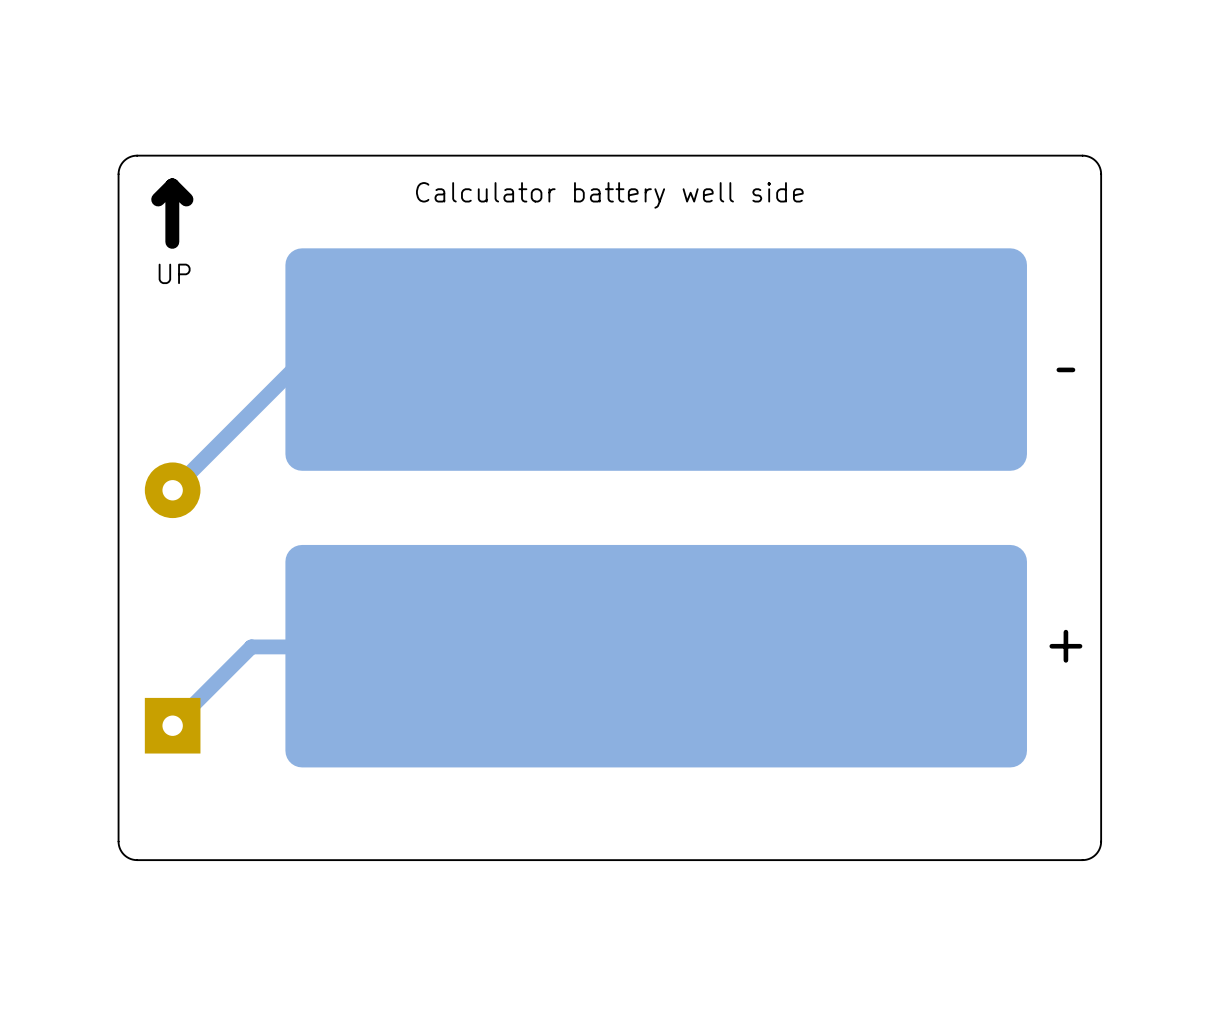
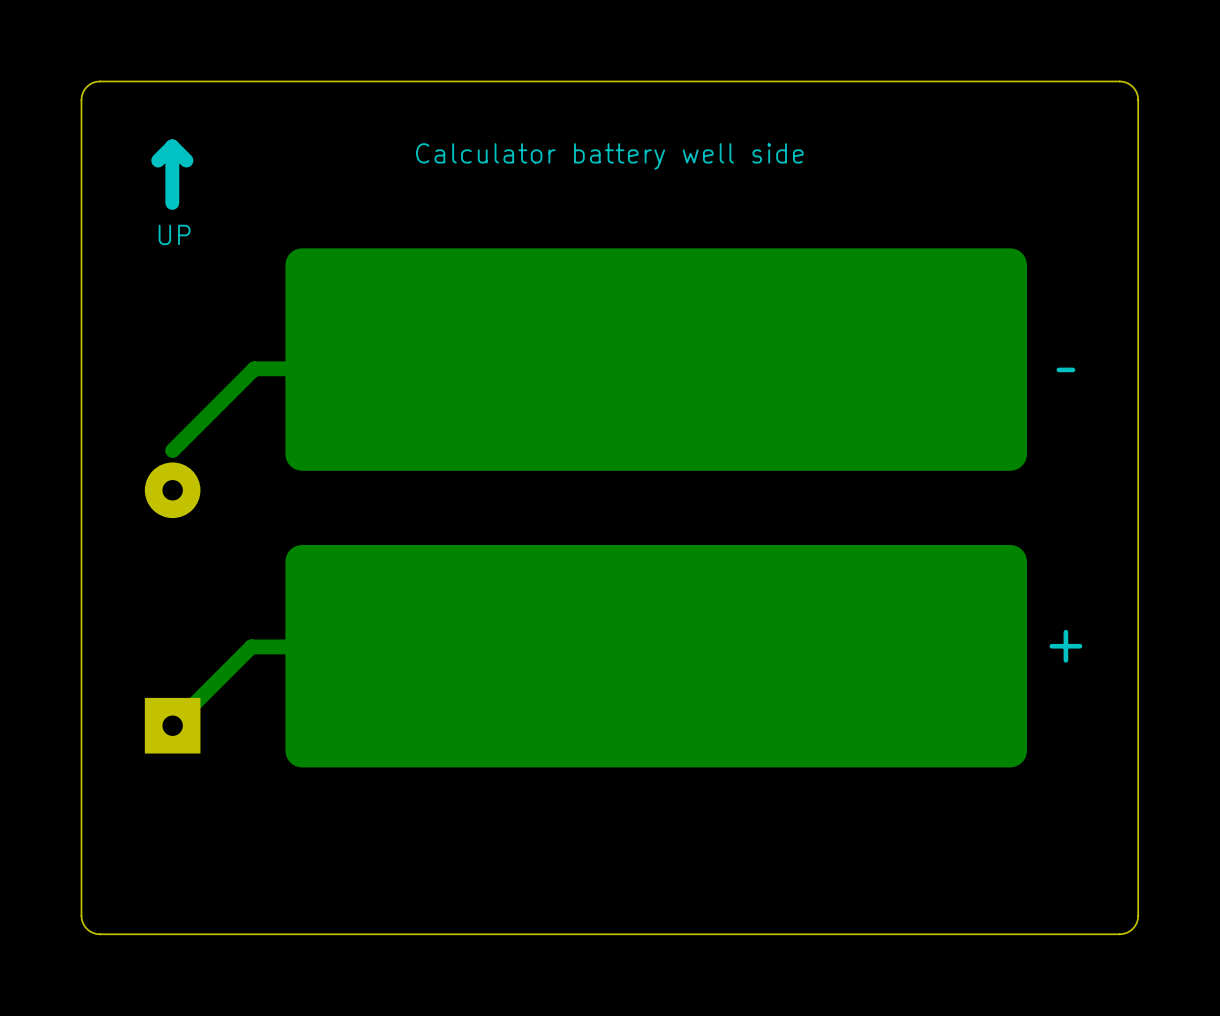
board edge: (1082, 155) (137, 155) (125, 159) (120, 166) (118, 174) (118, 841) (122, 853) (129, 858) (137, 860) (1082, 860) (1094, 856) (1099, 849) (1101, 841) (1101, 174) (1095, 161) (1082, 155) -> (1119, 81) (1132, 86) (1138, 100) (1138, 915) (1136, 923) (1131, 930) (1119, 934) (100, 934) (91, 932) (85, 927) (81, 915) (81, 100) (83, 91) (88, 85) (100, 81) (1119, 81)
text position: Calculator battery well side (609, 195) -> Calculator battery well side (609, 156)
text position: ↑ (172, 213) -> ↑ (172, 174)
text position: UP (174, 273) -> UP (174, 234)
track: (294, 368) (172, 490) -> (294, 368) (254, 368) (172, 450)

